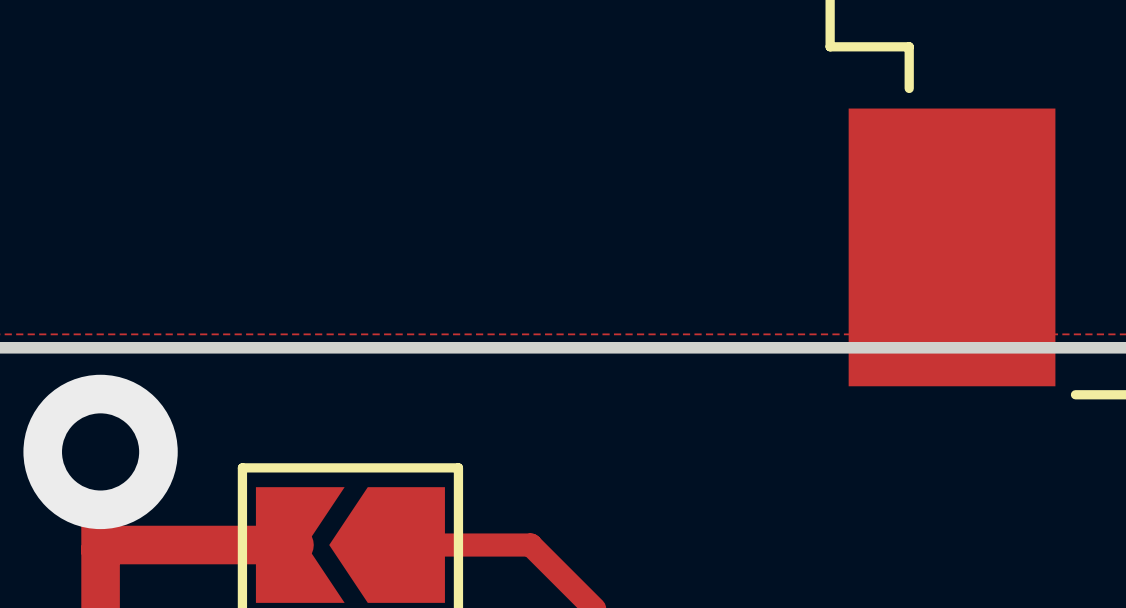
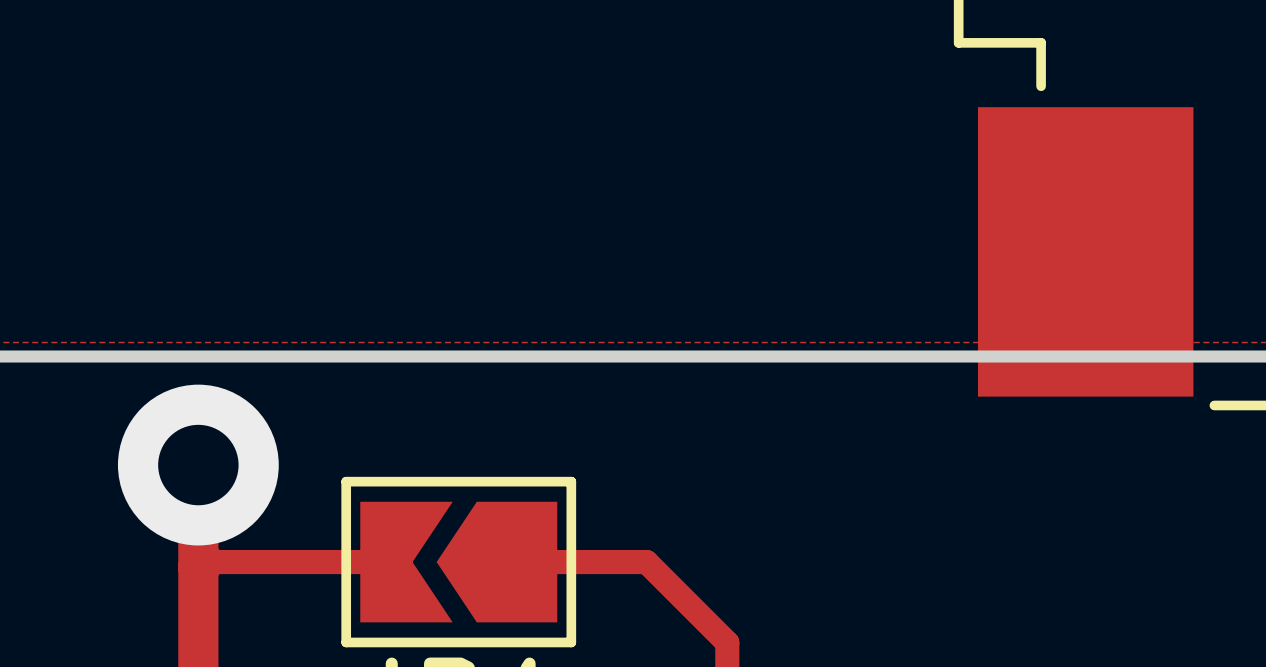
track width: thick (105, 545) (294, 545) -> thin (203, 562) (400, 562)

